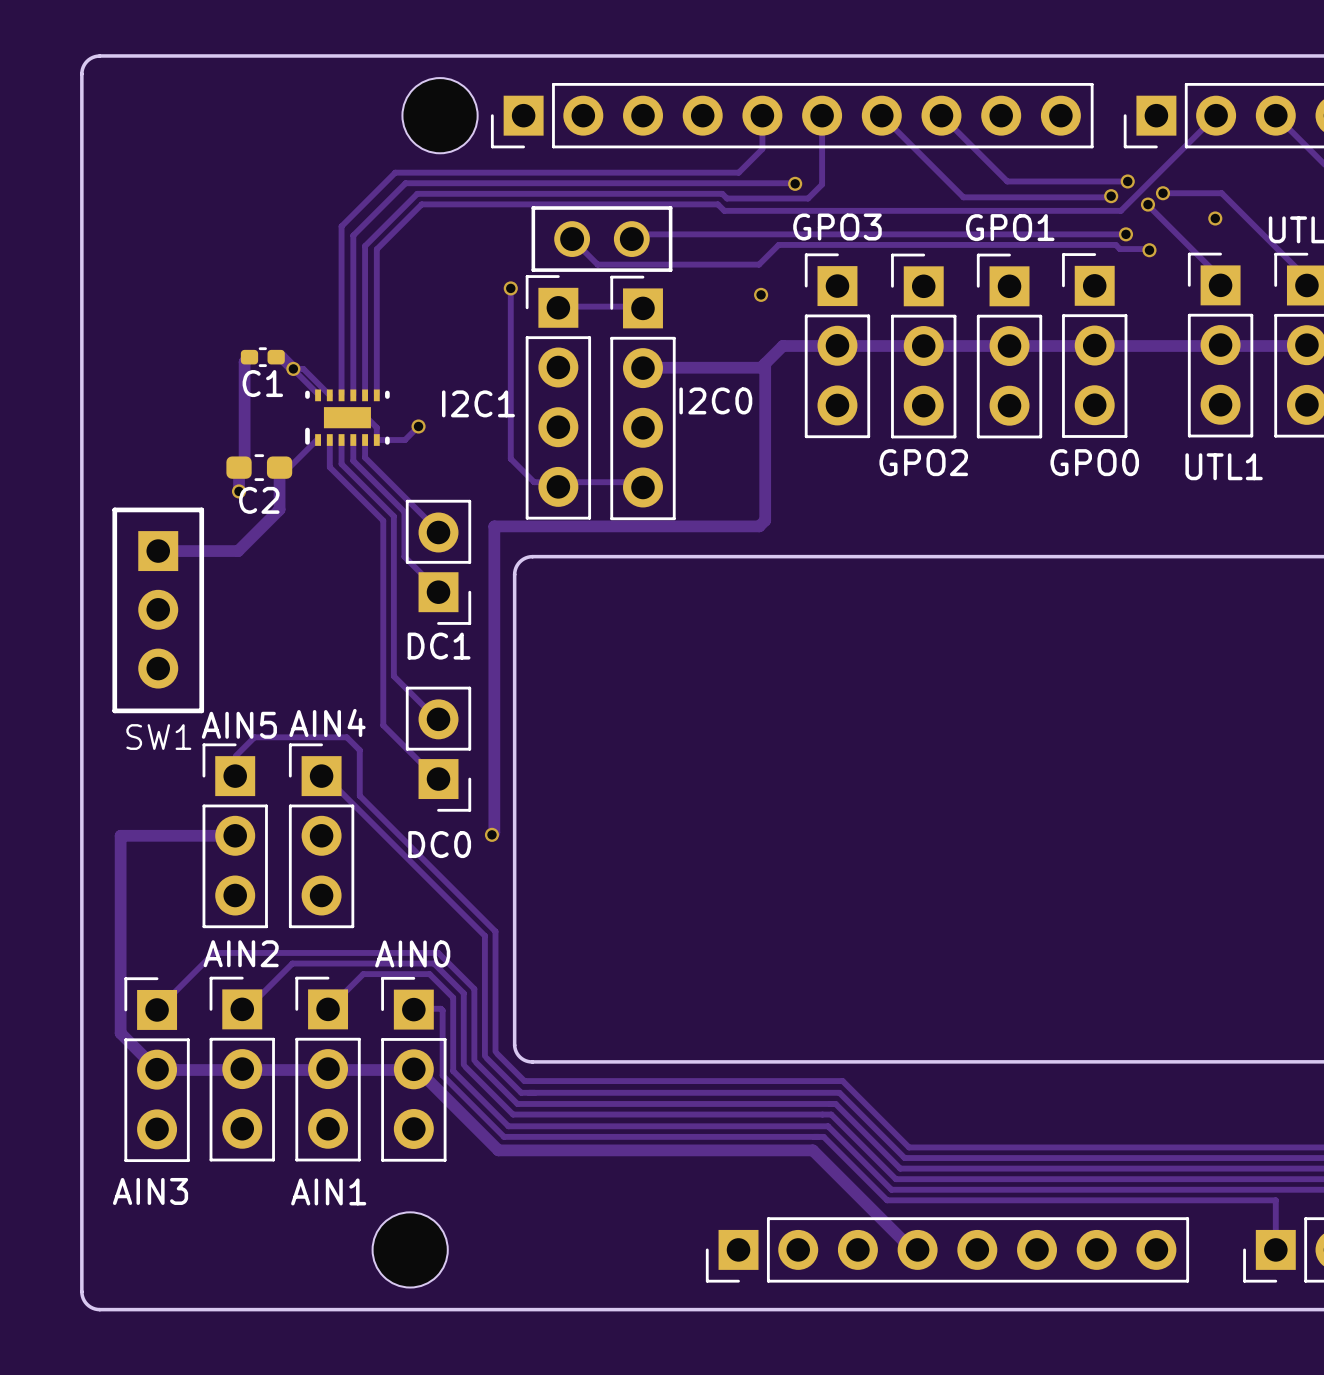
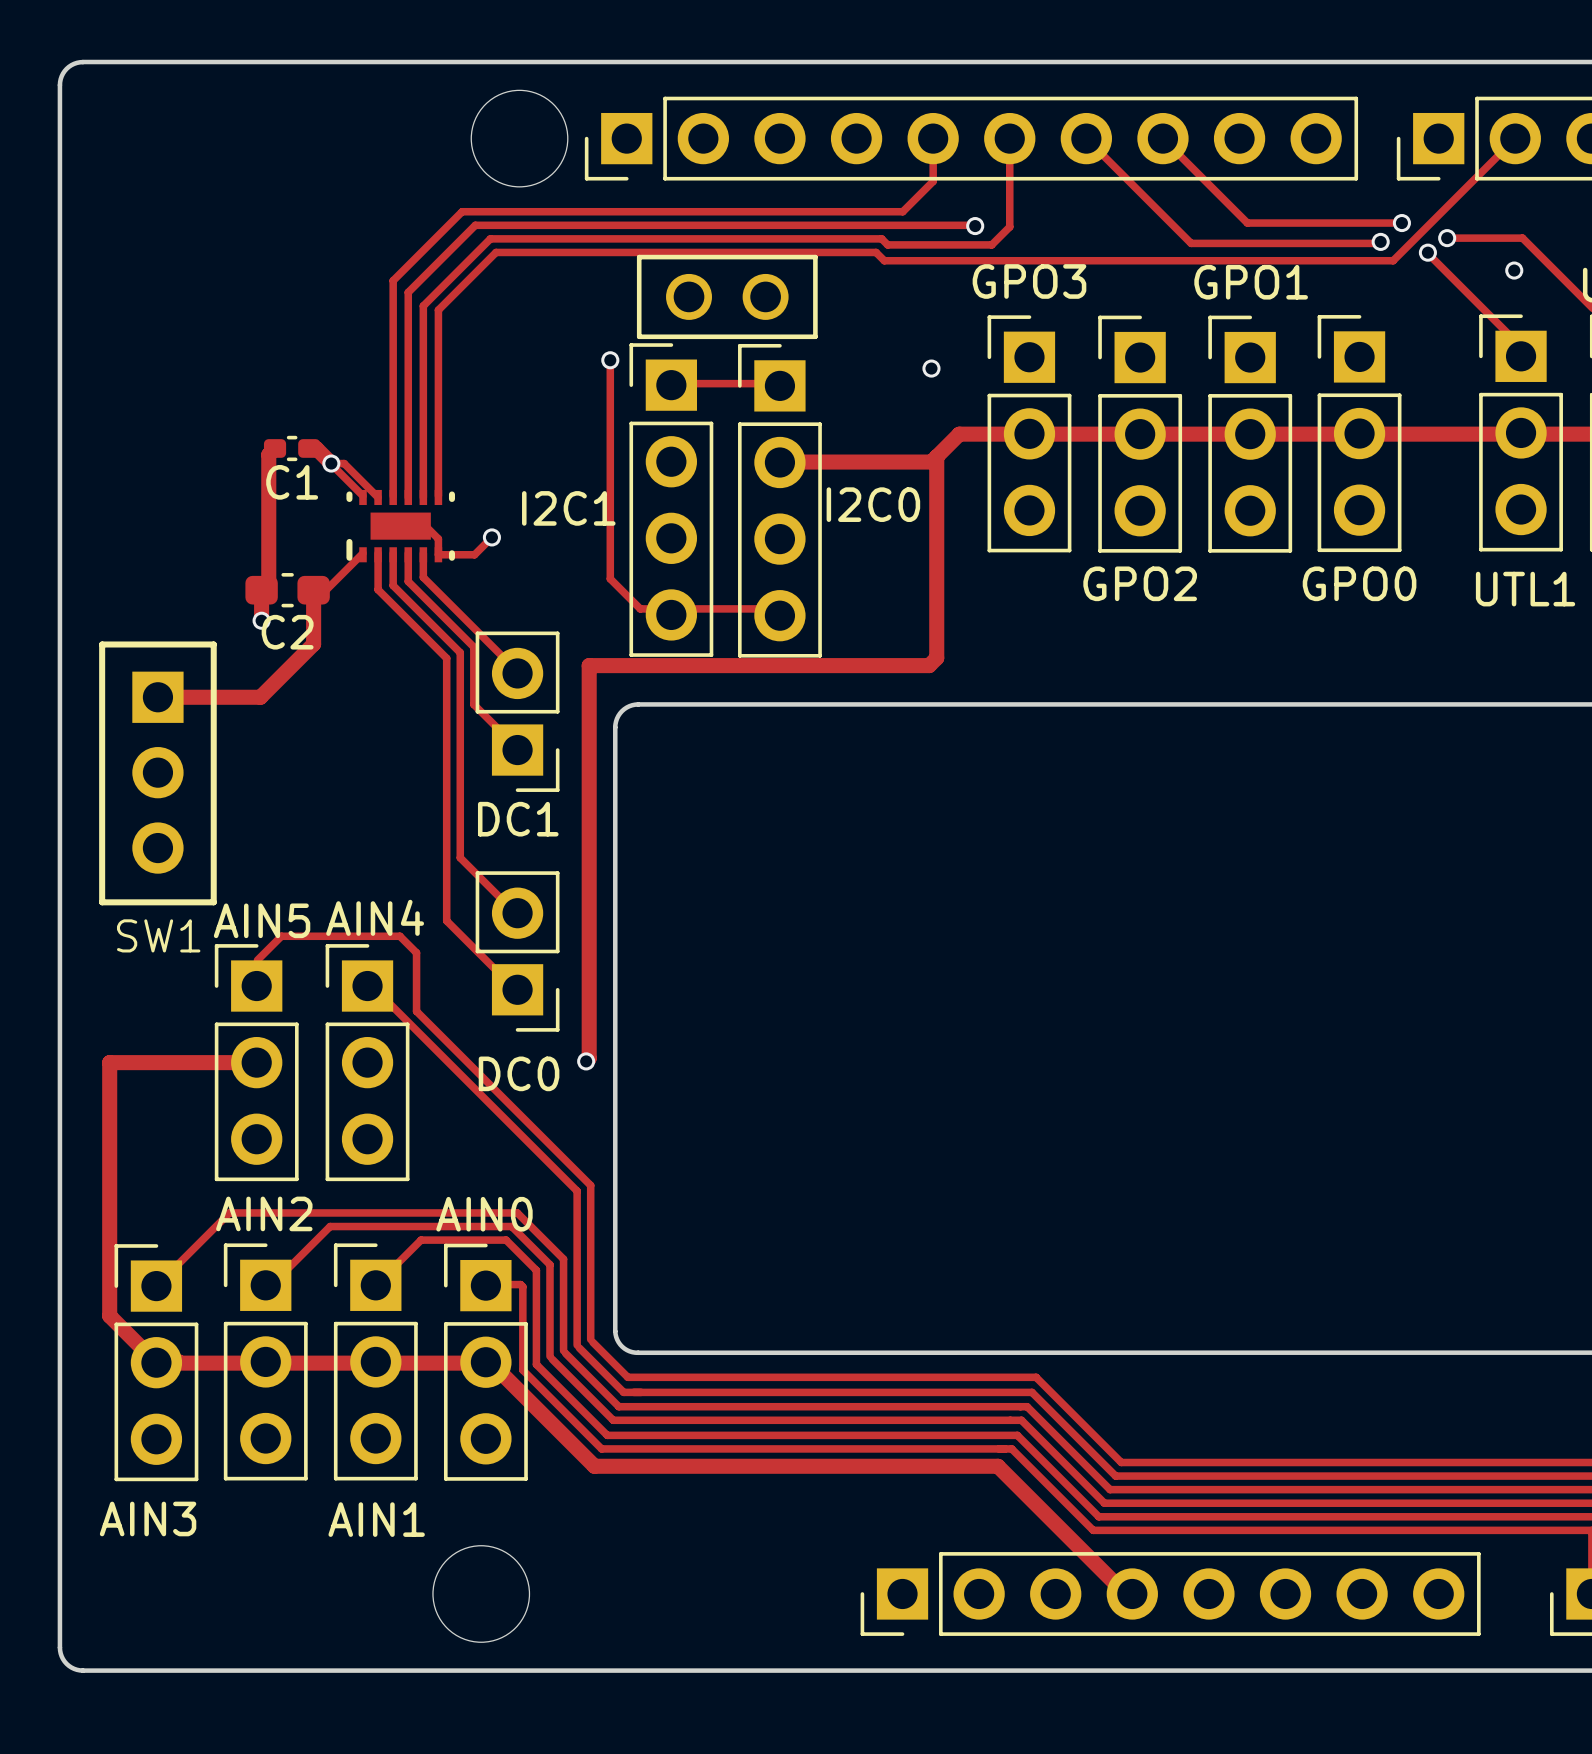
track: (1128, 232) (1125, 234) (636, 234) (631, 239) -> none
via: (1125, 234) -> none
track: (572, 239) (597, 264) (759, 264) (778, 244) (1115, 244) (1119, 249) (1150, 249) -> none
via: (1149, 250) -> none

